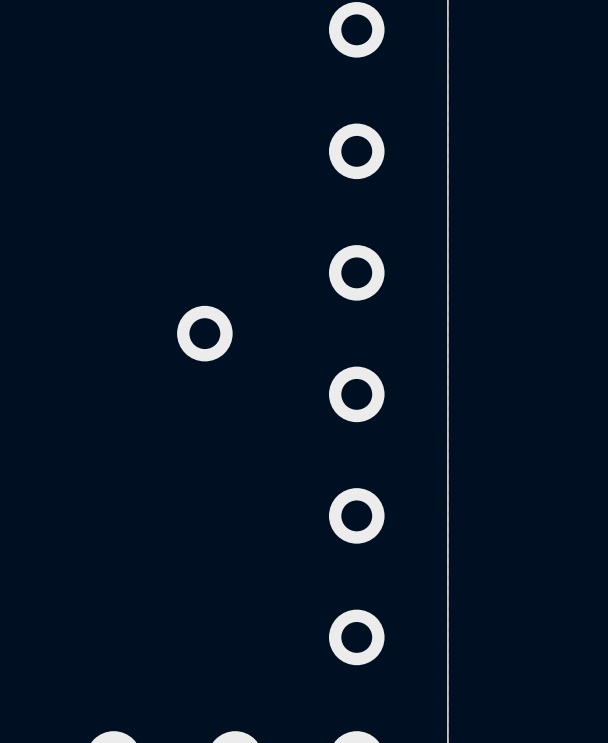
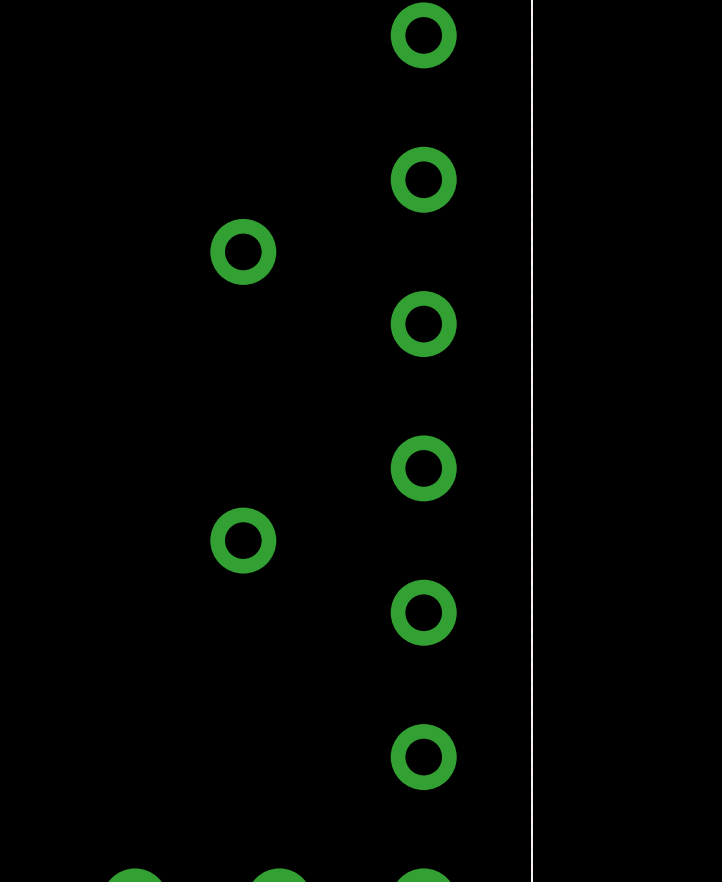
via: none -> (243, 251)
via: (204, 333) -> none
via: none -> (243, 540)

